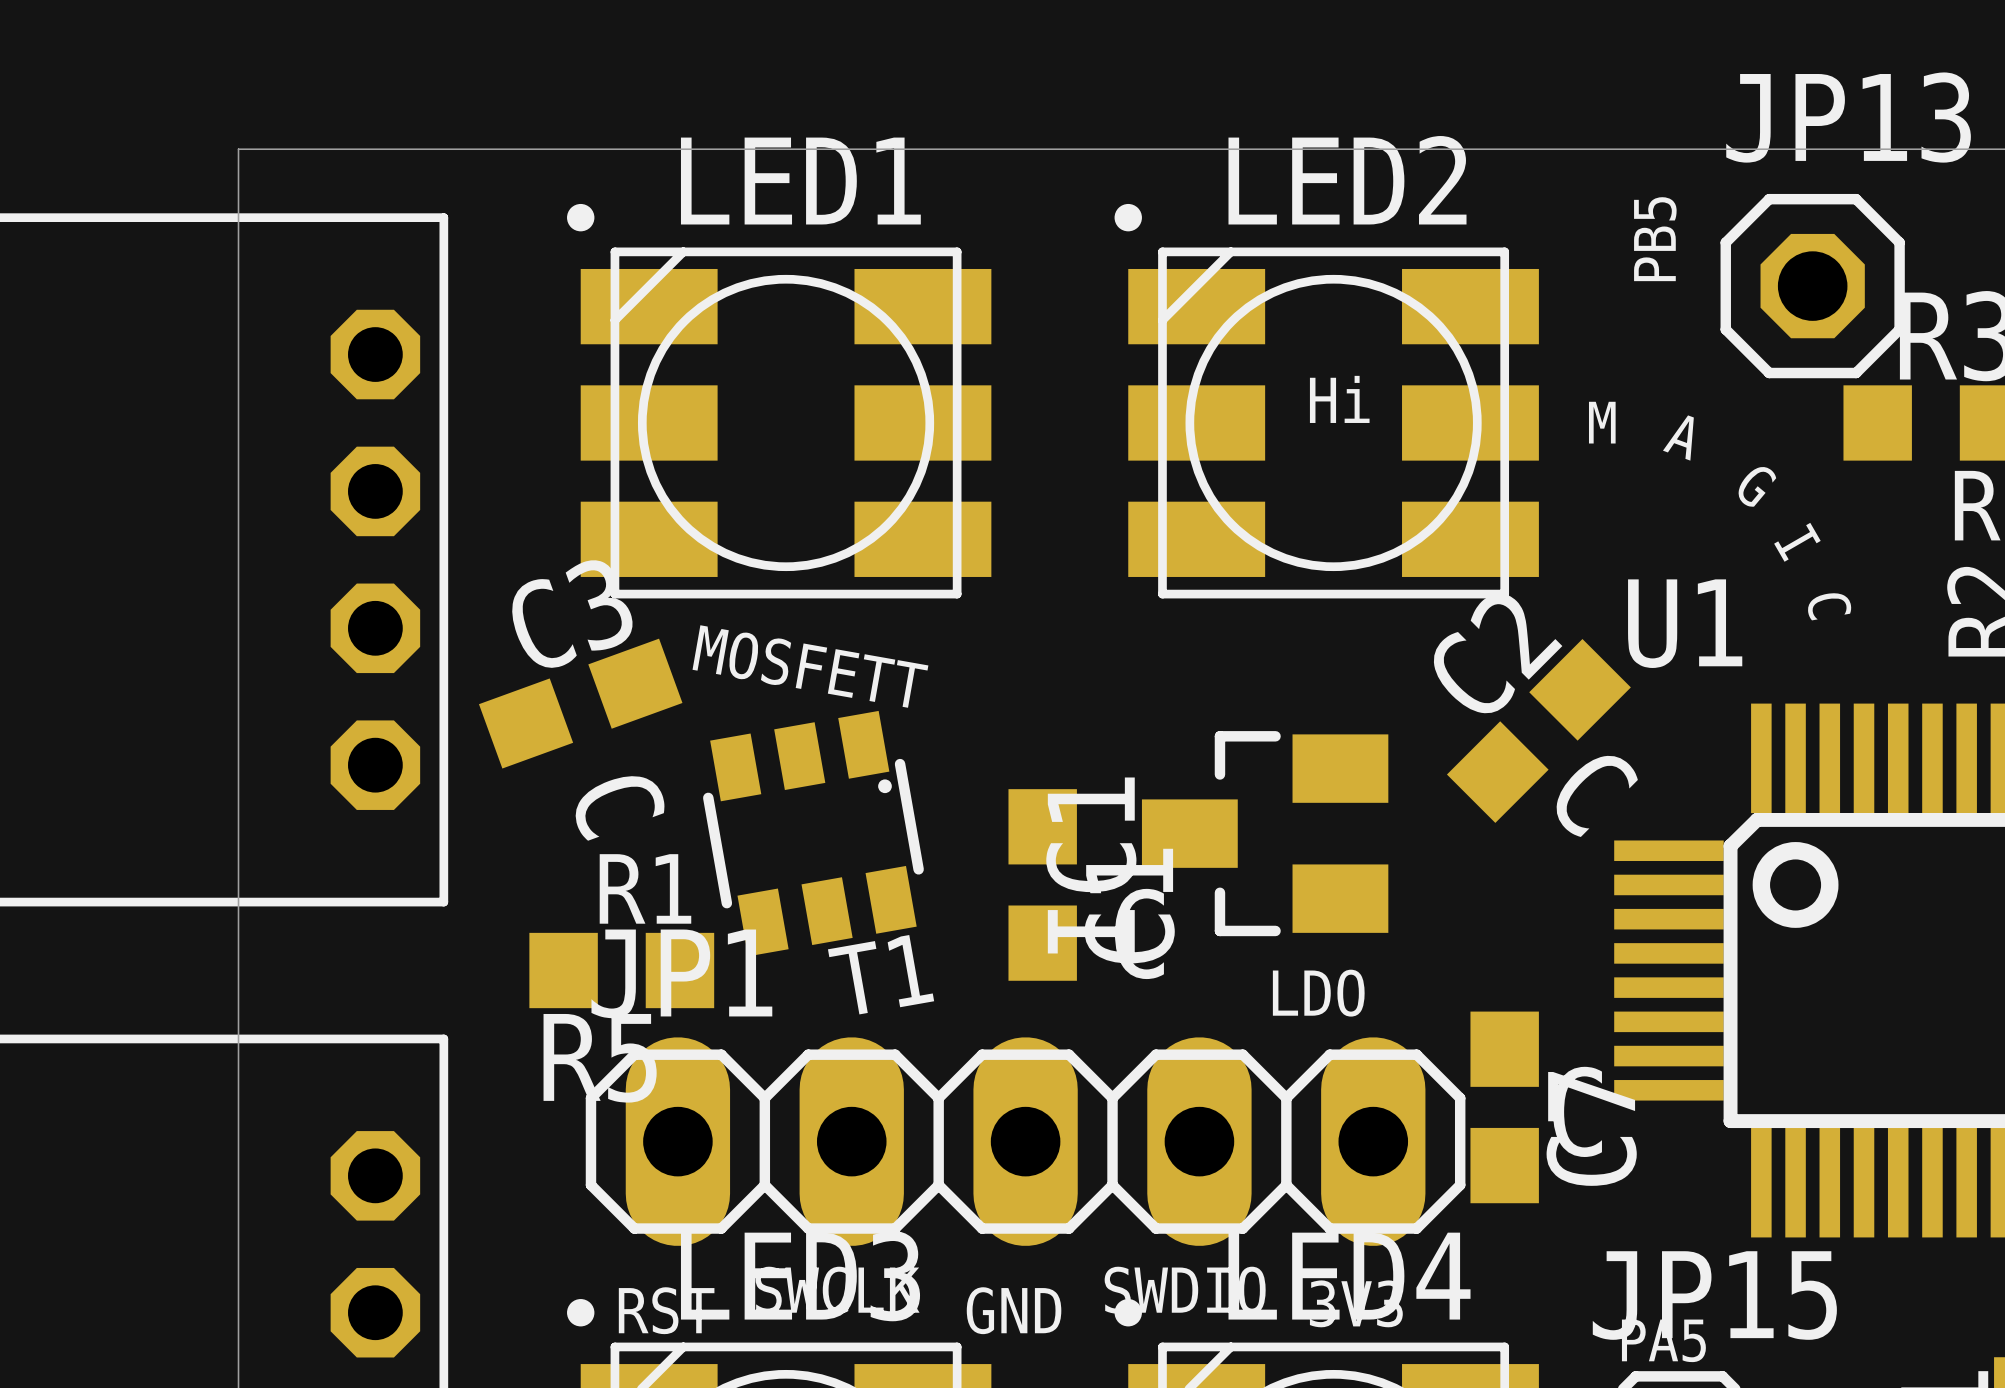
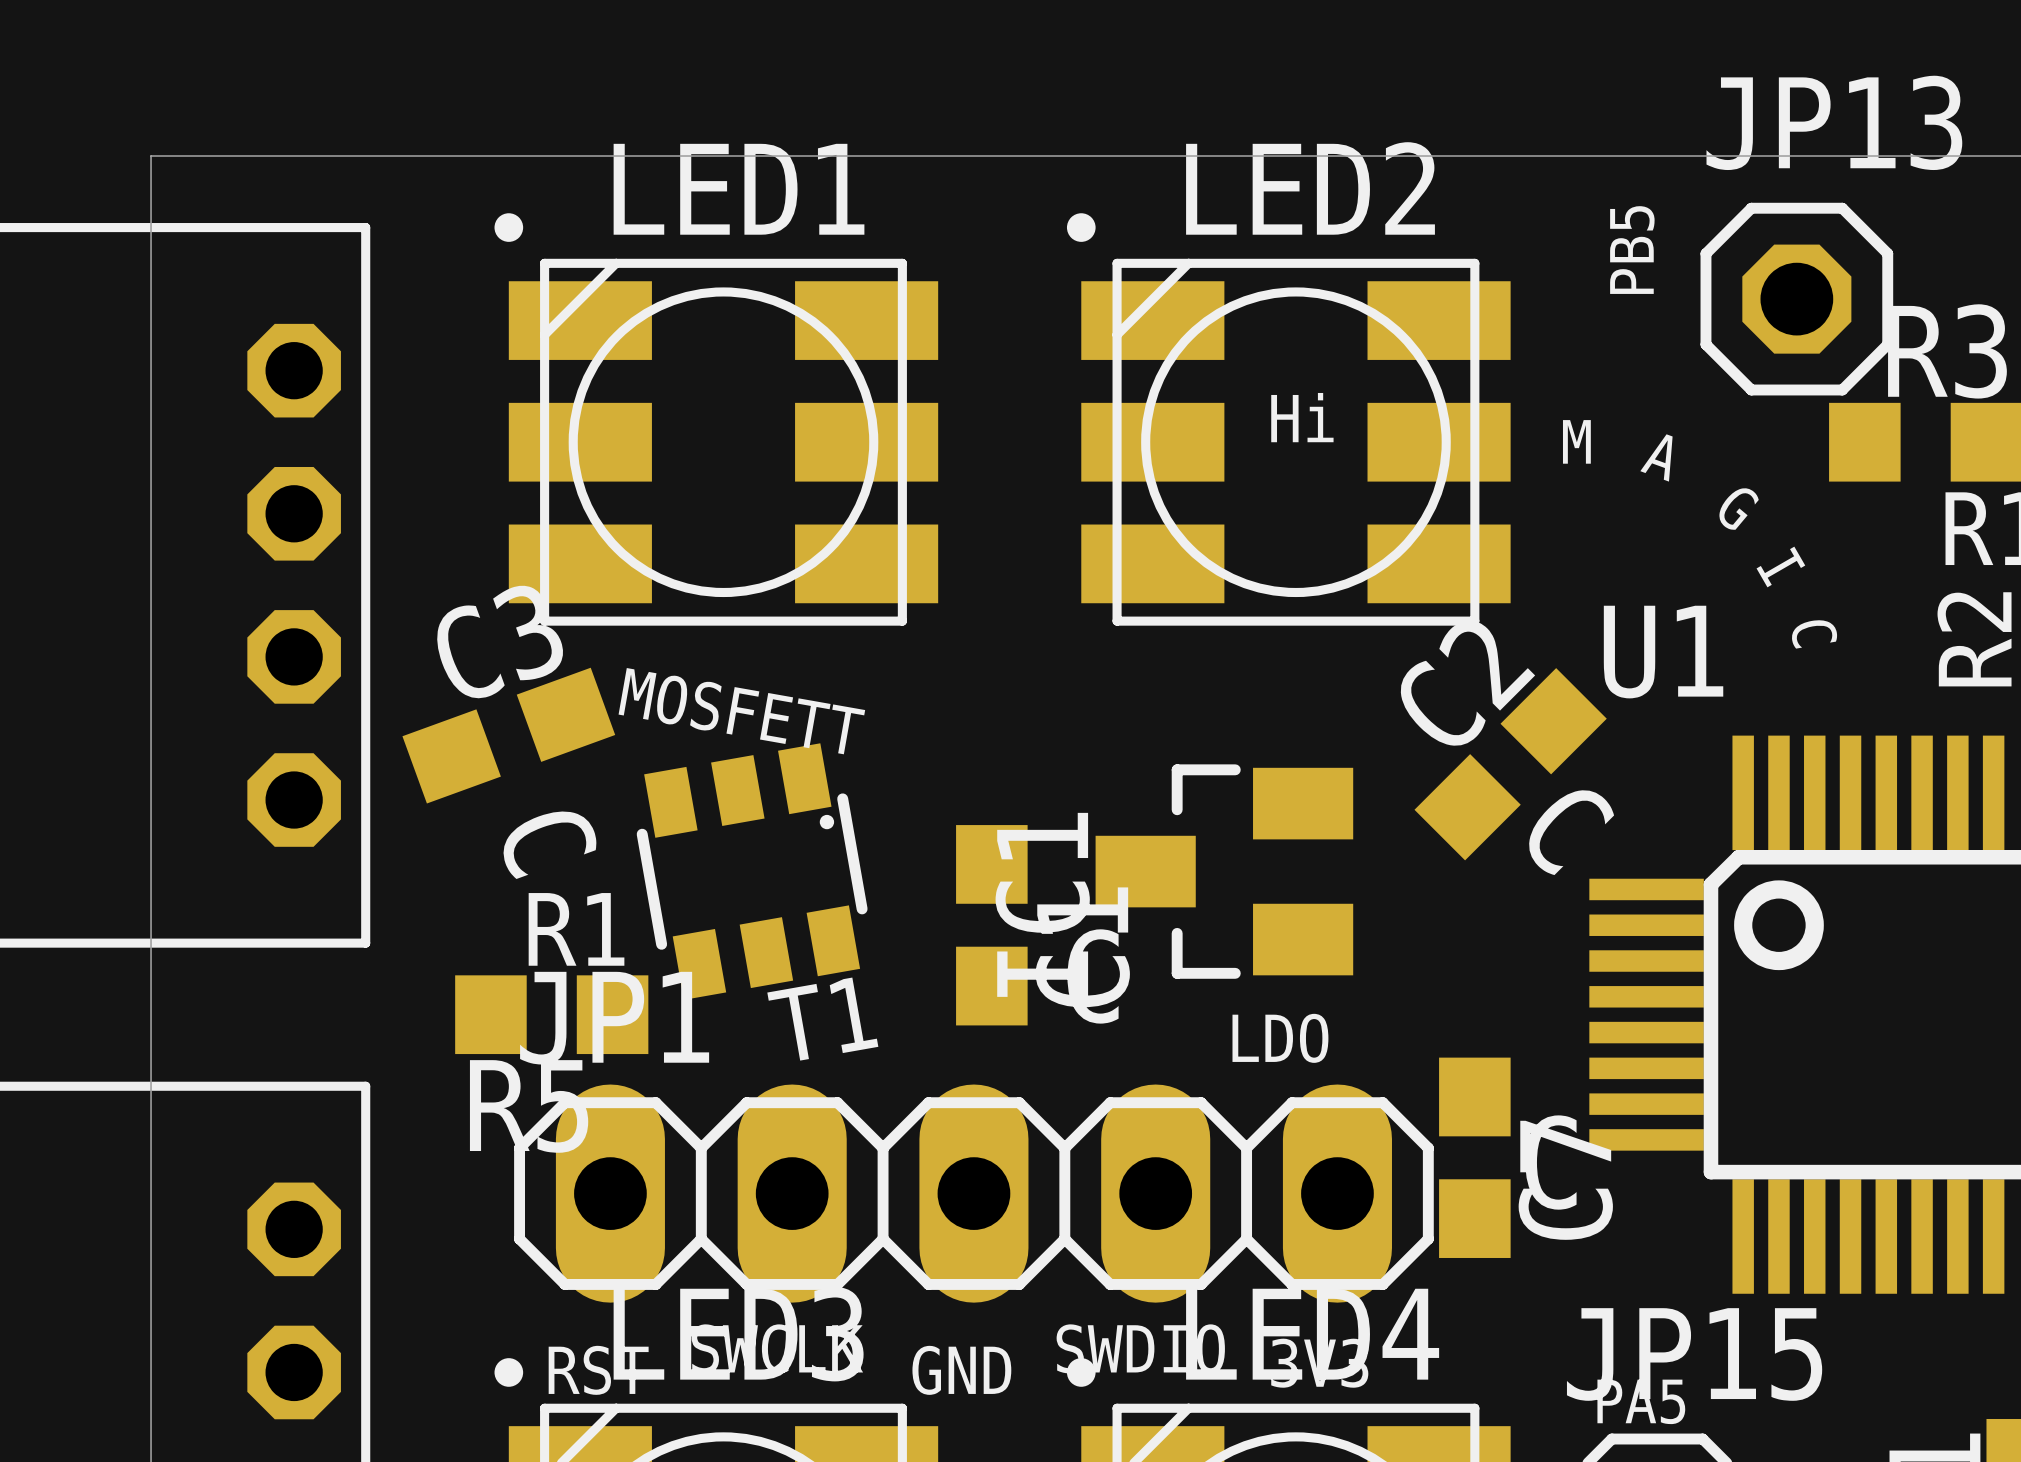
text position: MOSFETT (810, 666) -> MOSFETT (741, 711)

